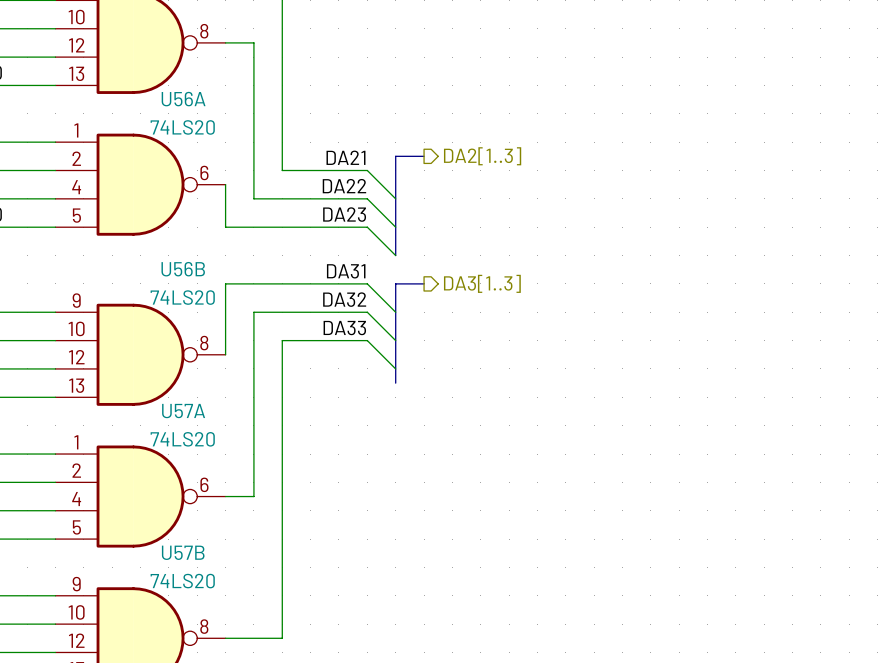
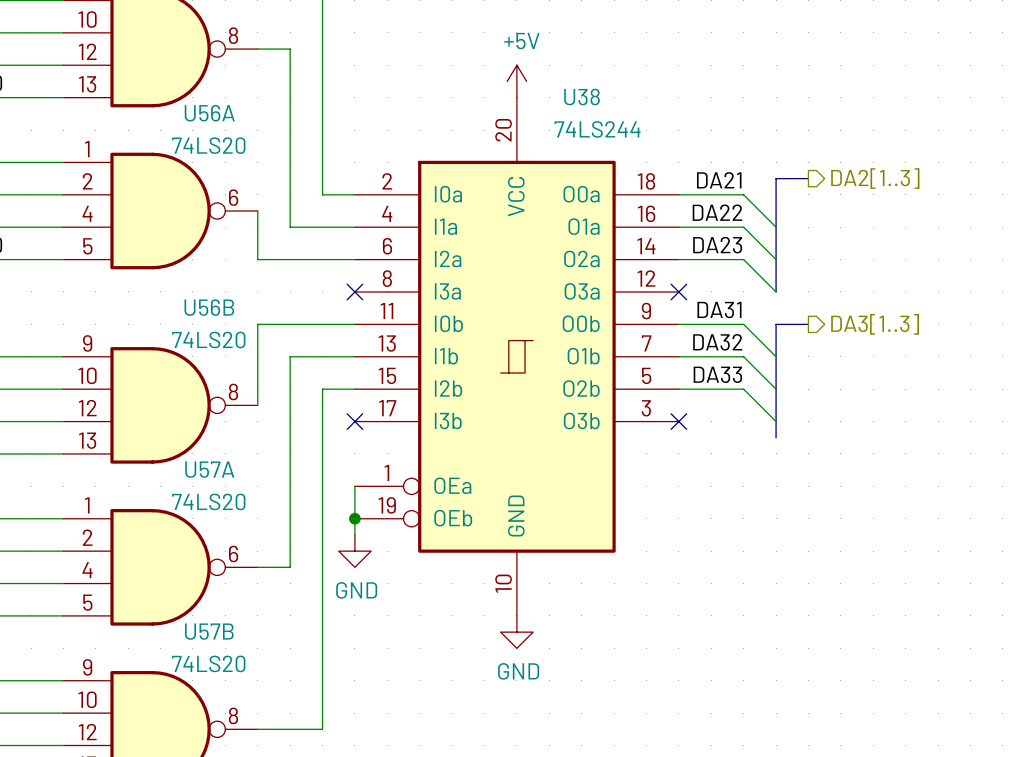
power symbol: none -> +5V (516, 81)
bus: (424, 156) (395, 156) (395, 255) -> none
hierarchical label: DA2[1..3] (482, 156) -> none
bus: none -> (808, 178) (776, 178) (776, 291)
hierarchical label: none -> DA2[1..3] (875, 178)
label: DA21 (345, 157) -> none
label: none -> DA21 (719, 180)
wire: none -> (678, 194) (743, 194) (776, 227)
label: DA22 (344, 186) -> none
label: none -> DA22 (717, 212)
wire: none -> (678, 227) (743, 227) (776, 259)
label: DA23 (344, 214) -> none
label: none -> DA23 (717, 245)
wire: none -> (678, 259) (743, 259) (776, 291)
no-connect mark: none -> (354, 291)
no-connect mark: none -> (678, 291)
label: DA31 (346, 271) -> none
label: none -> DA31 (719, 310)
bus: (424, 283) (395, 283) (395, 383) -> none
hierarchical label: DA3[1..3] (482, 283) -> none
wire: none -> (678, 324) (743, 324) (776, 356)
bus: none -> (808, 324) (776, 324) (776, 437)
hierarchical label: none -> DA3[1..3] (875, 324)
label: DA32 (344, 299) -> none
label: none -> DA32 (717, 342)
U38: none -> 74LS244 (516, 356)
wire: none -> (678, 356) (743, 356) (776, 389)
label: DA33 (344, 328) -> none
label: none -> DA33 (717, 374)
wire: none -> (678, 389) (743, 389) (776, 421)
no-connect mark: none -> (354, 421)
no-connect mark: none -> (678, 421)
wire: none -> (354, 486) (354, 534)
junction: none -> (354, 518)
power symbol: none -> GND (354, 551)
power symbol: none -> GND (516, 632)

